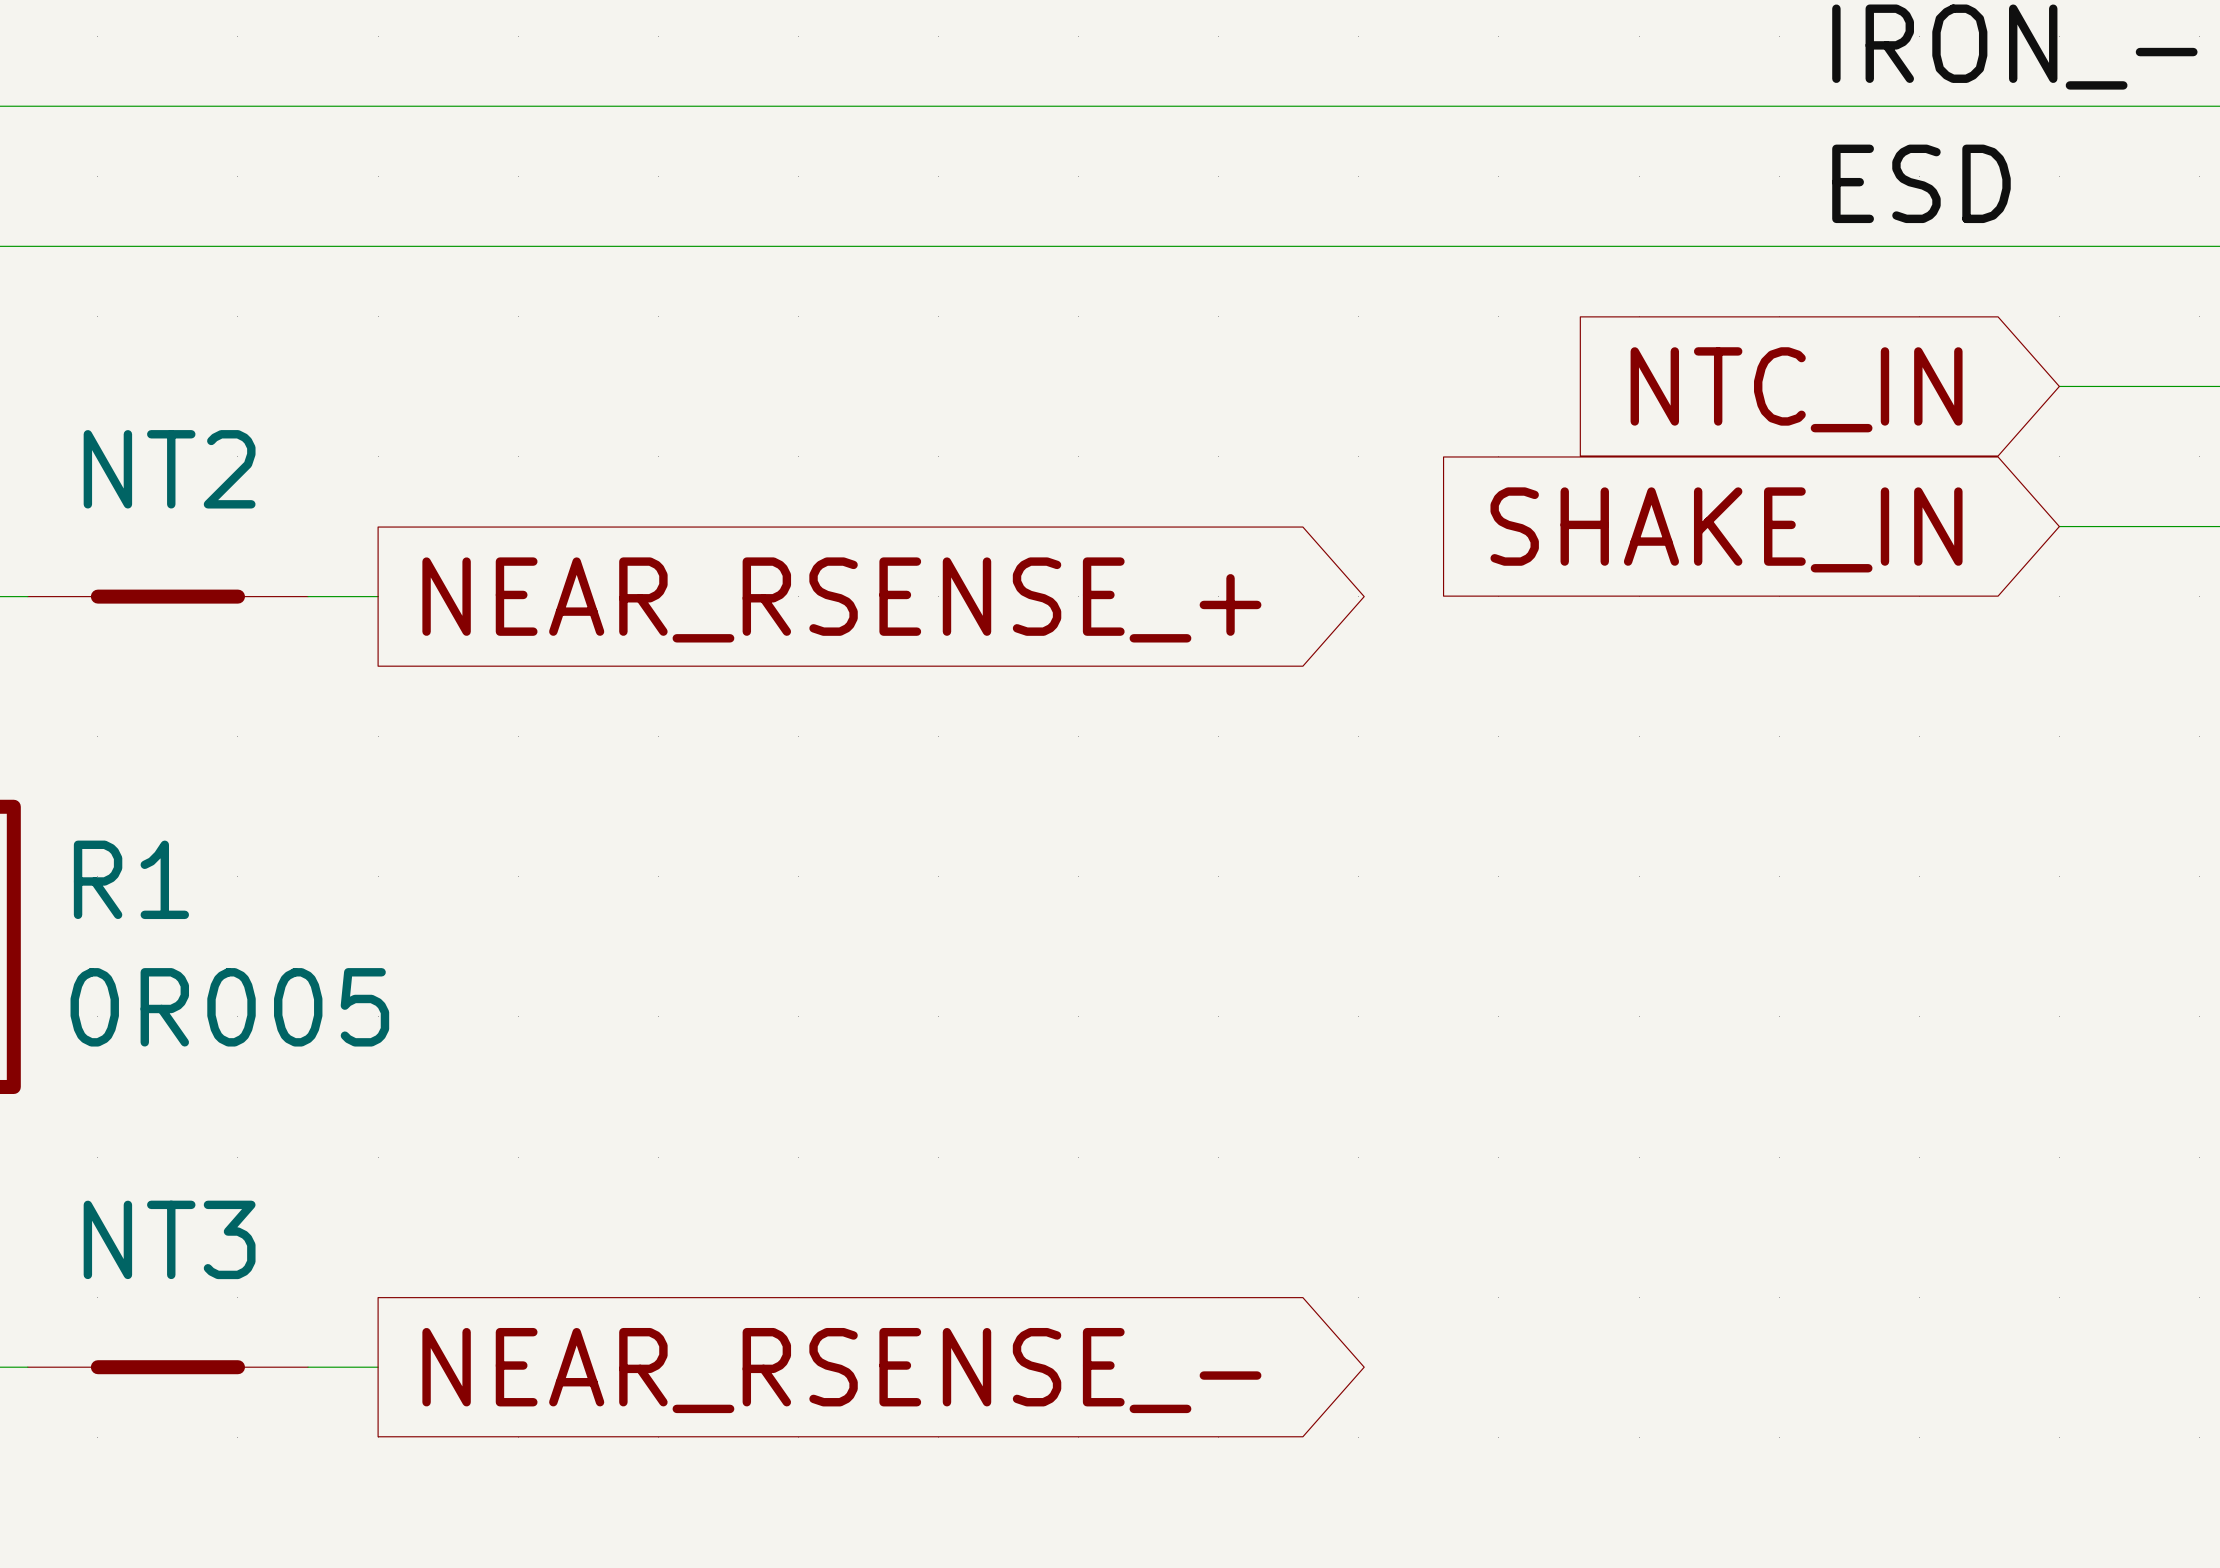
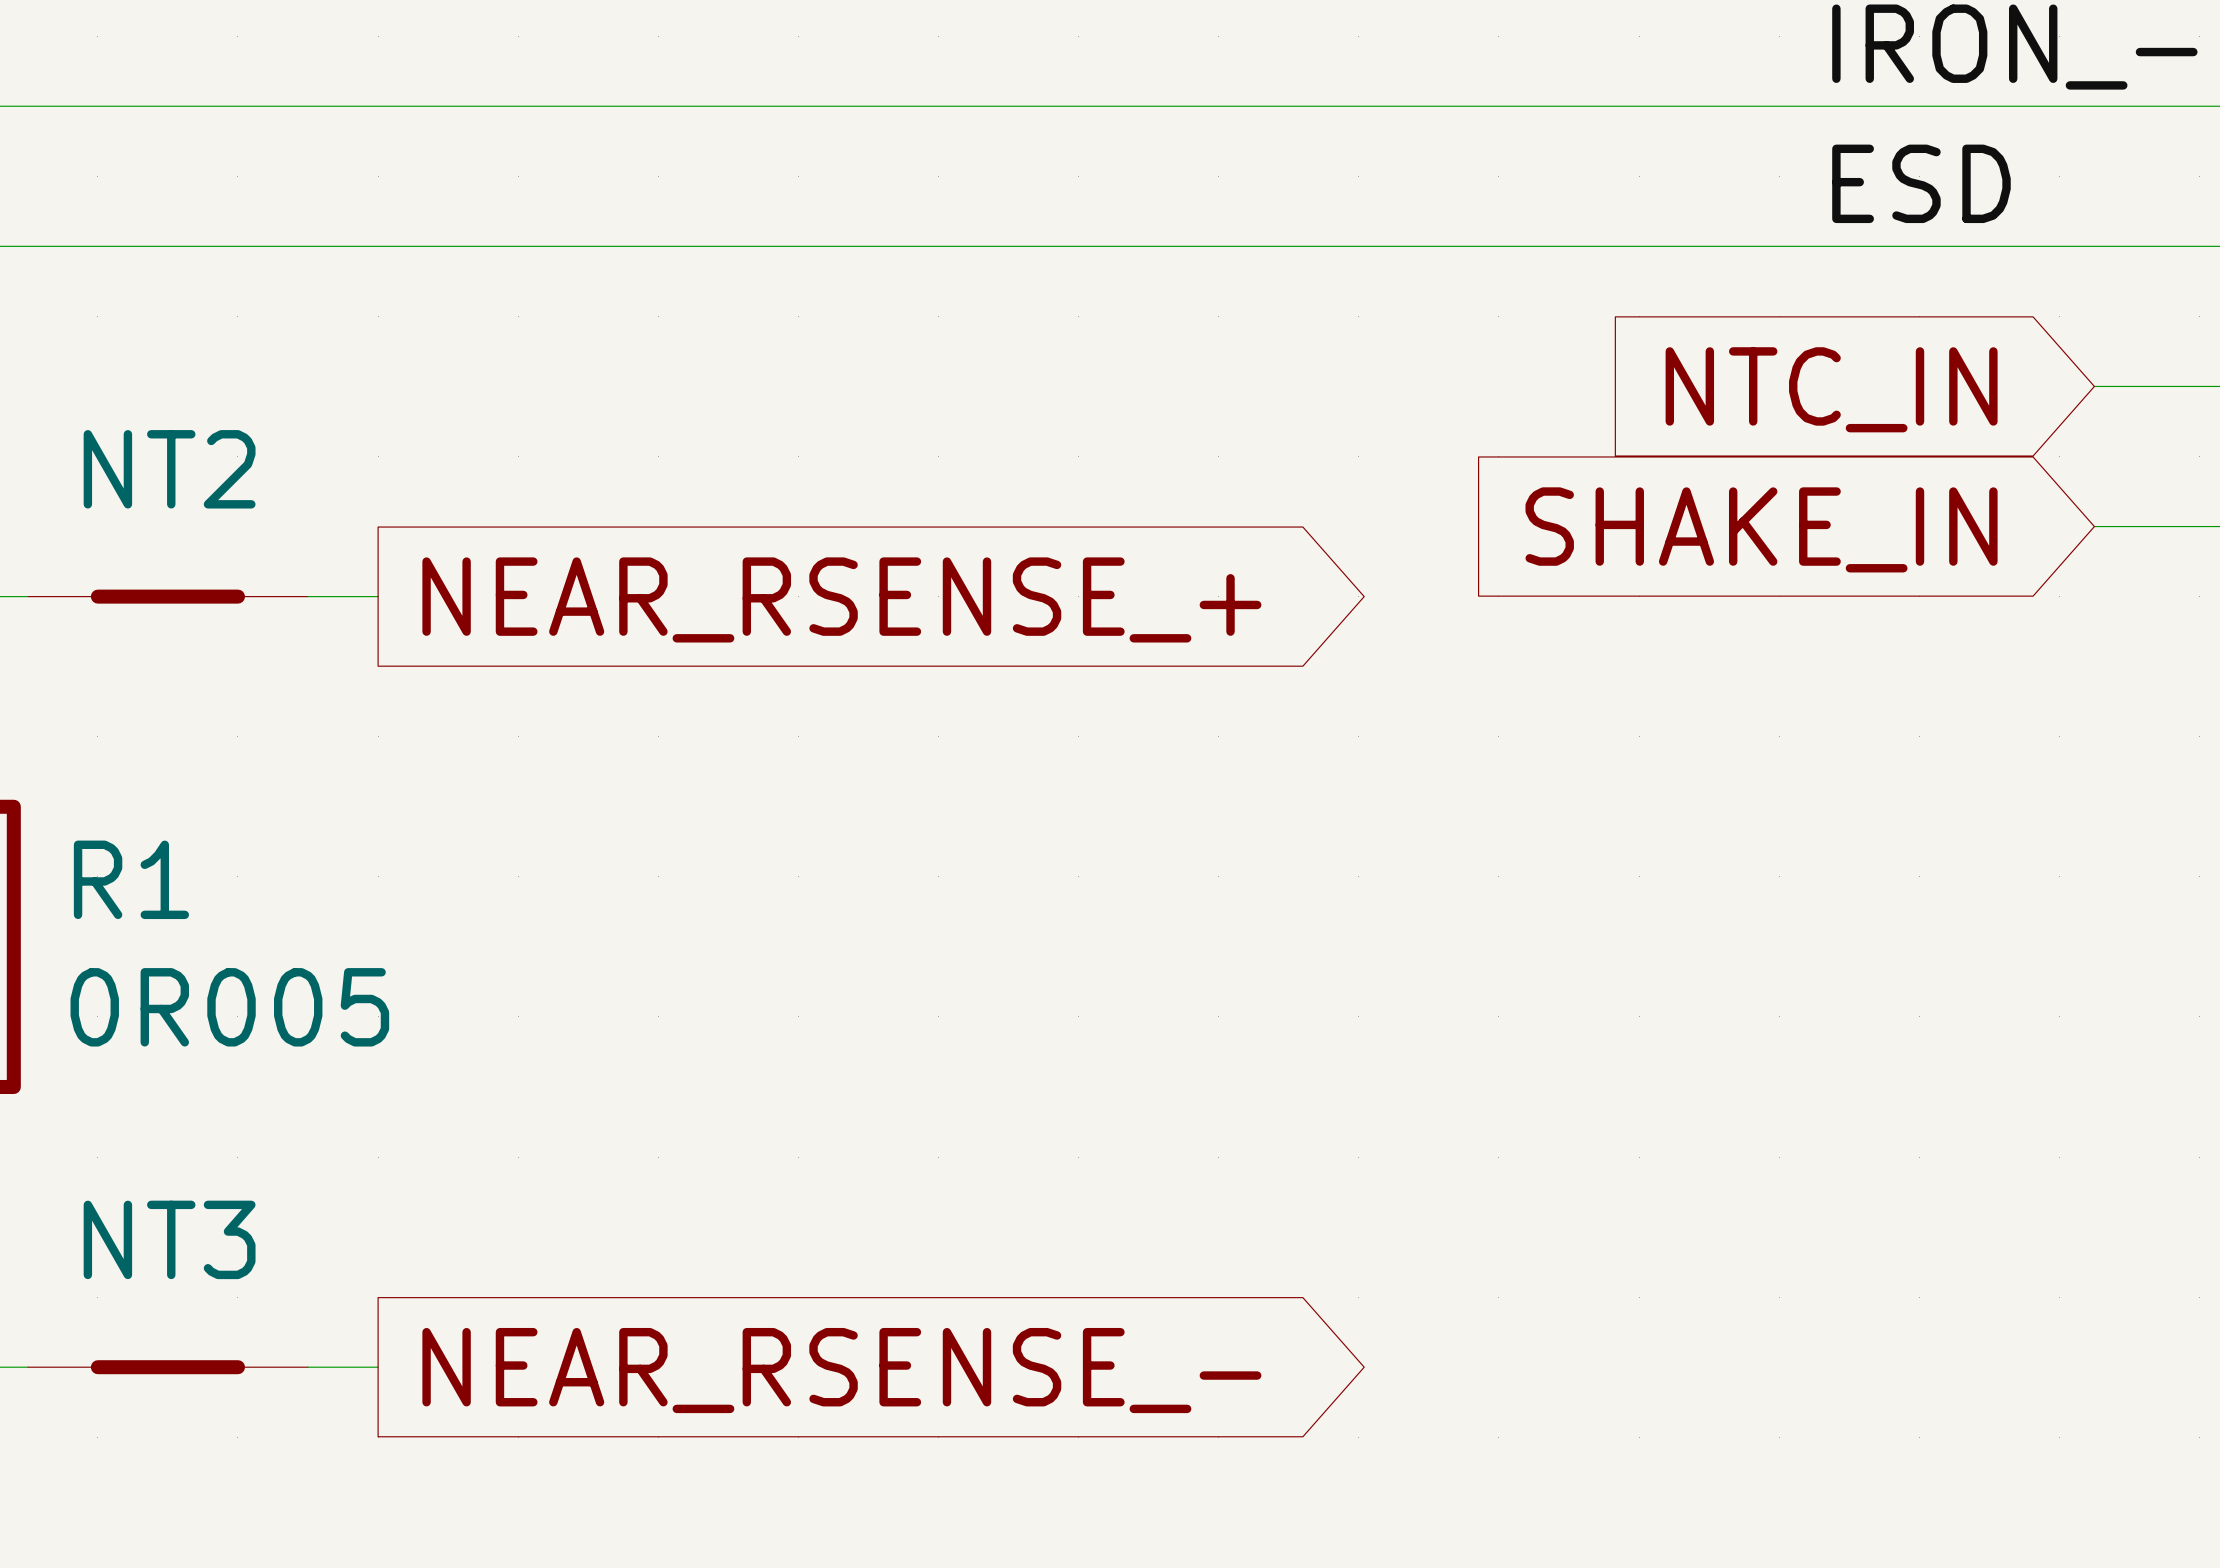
wire: (2059, 386) (2094, 386) -> none
global label position: NTC_IN (1796, 389) -> NTC_IN (1831, 389)
wire: (2059, 526) (2094, 526) -> none
global label position: SHAKE_IN (1726, 529) -> SHAKE_IN (1761, 529)

